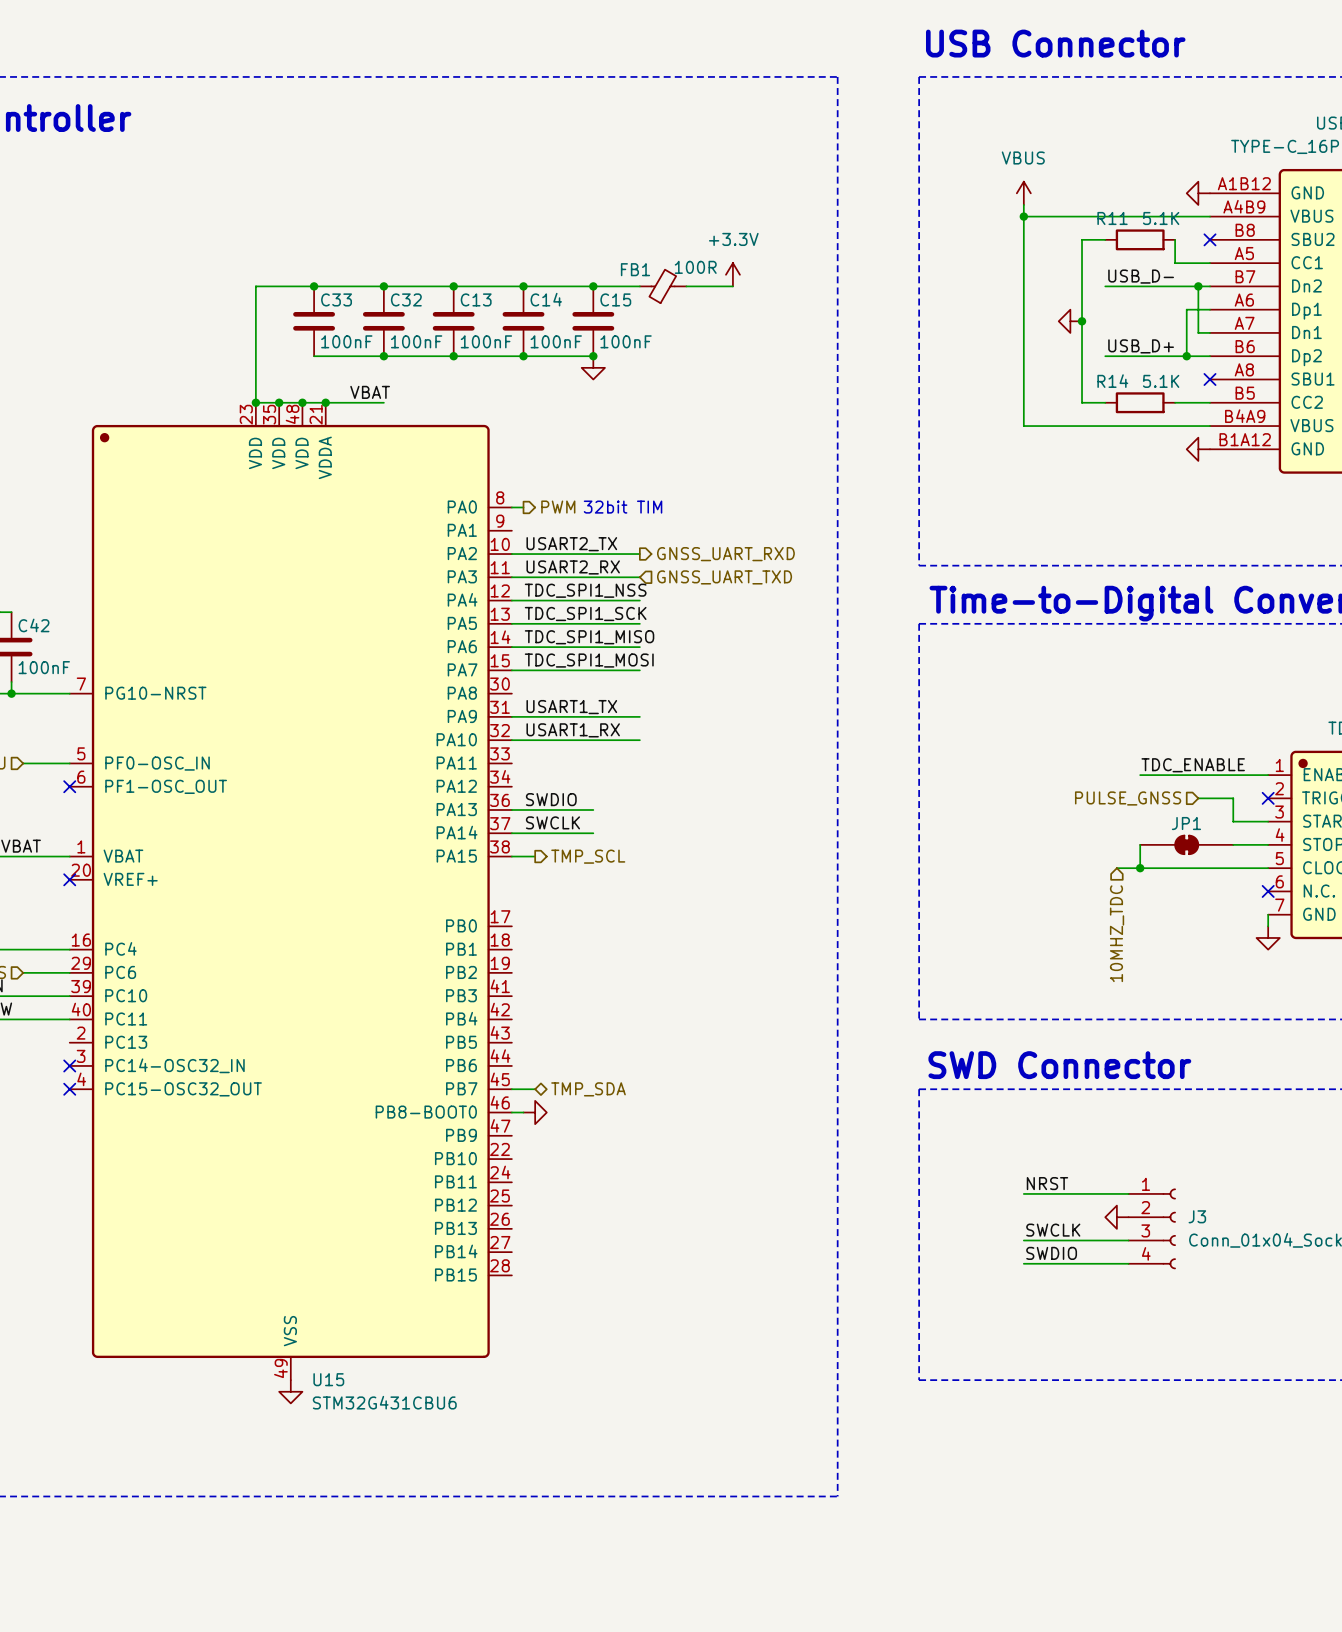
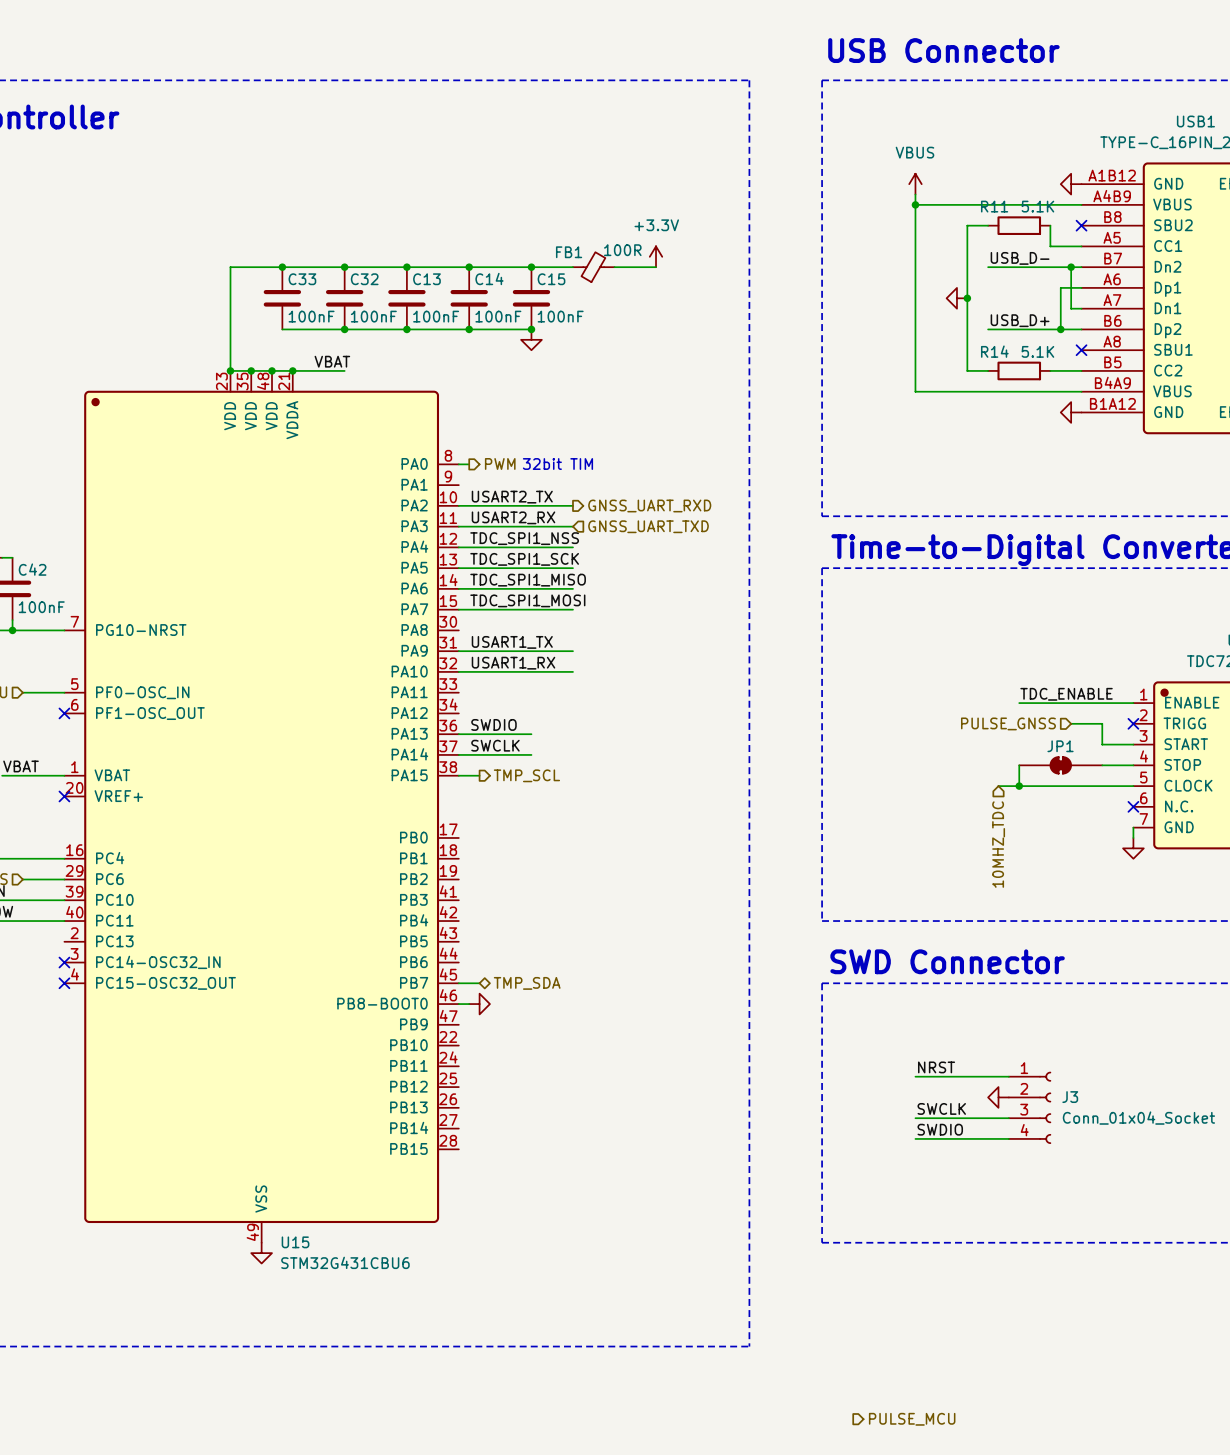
hierarchical label: none -> PULSE_MCU (912, 1419)

